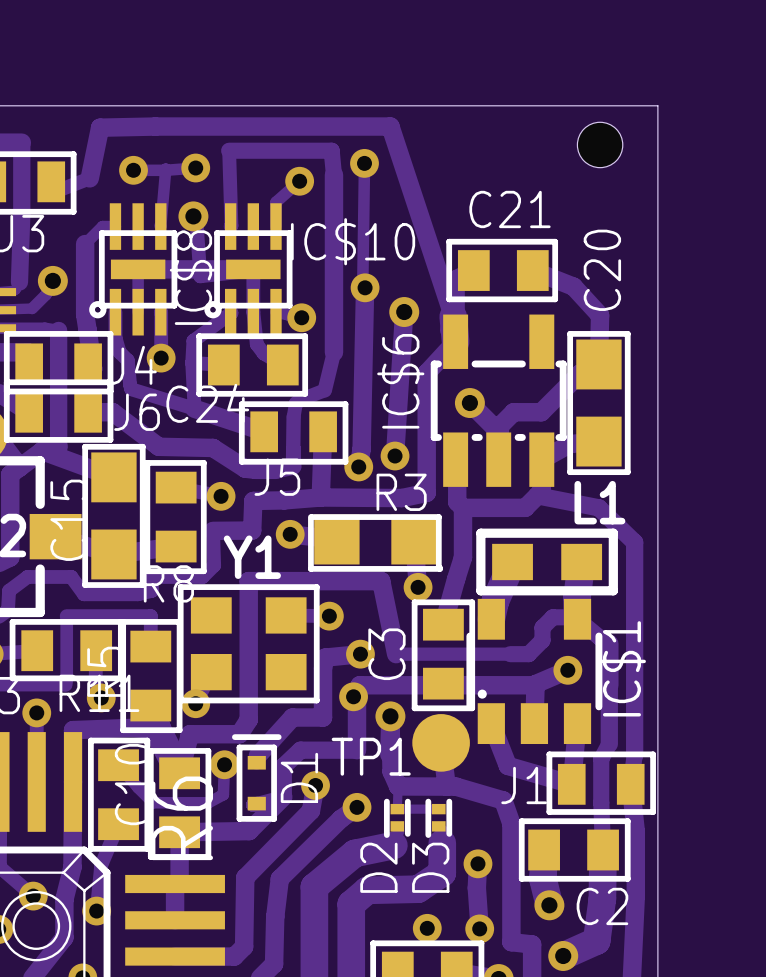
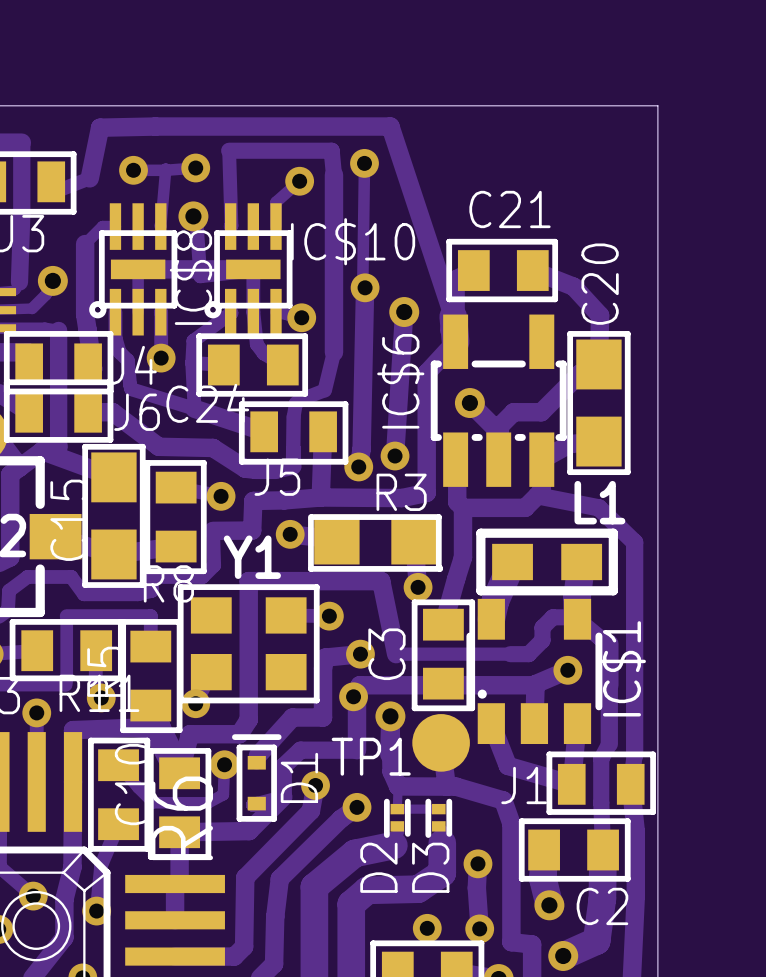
hole: (600, 144) -> none
C20 name position: C20 (602, 270) -> C20 (600, 284)

